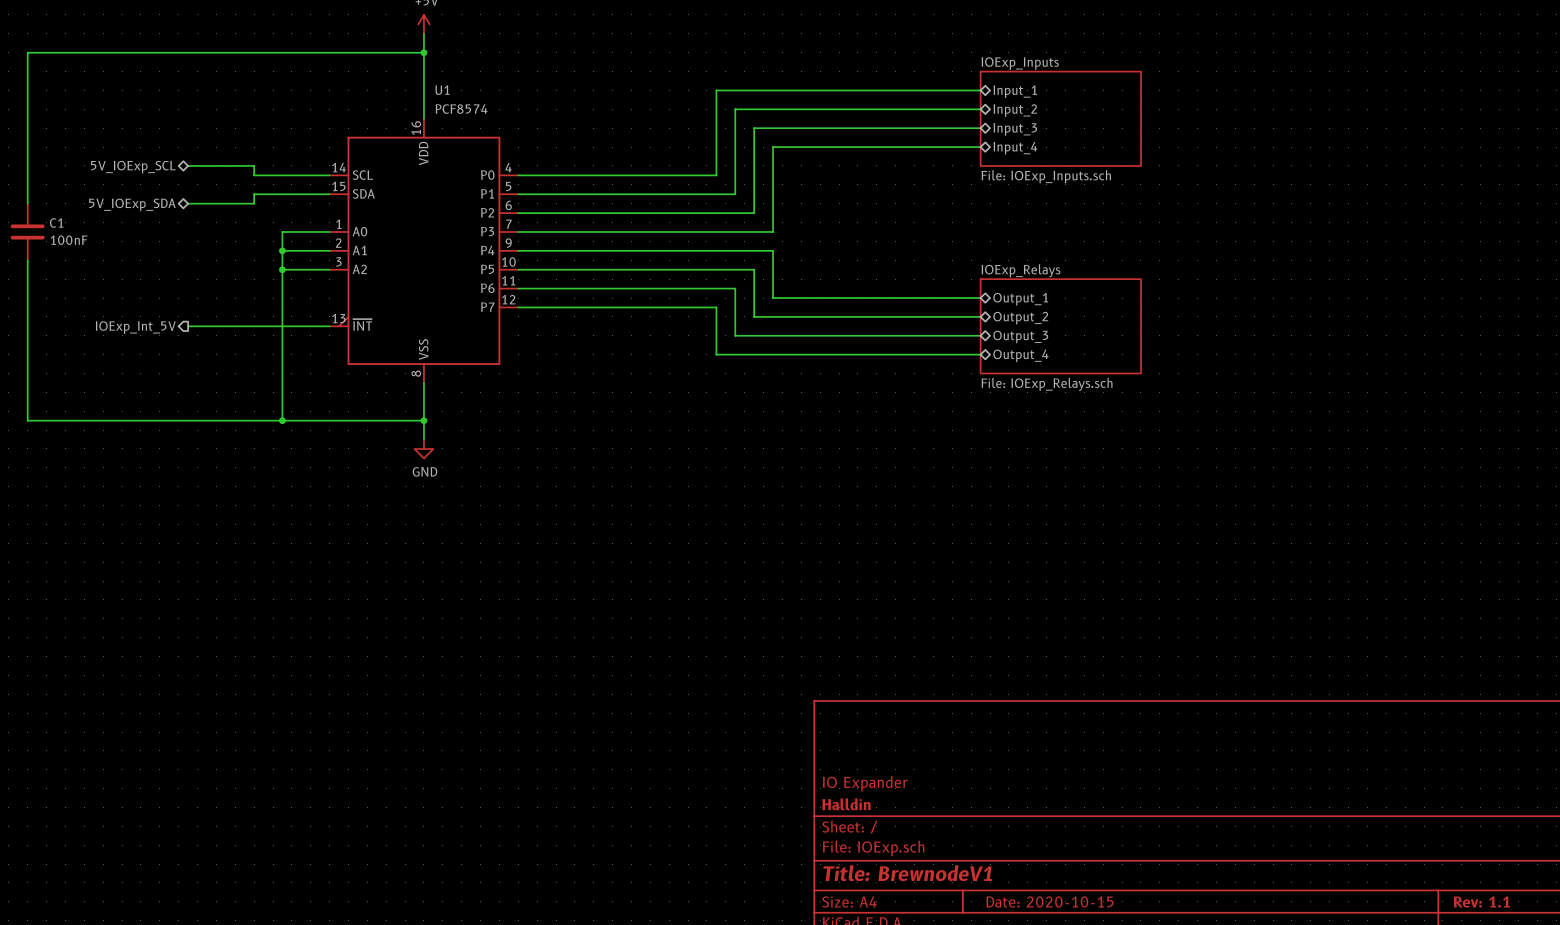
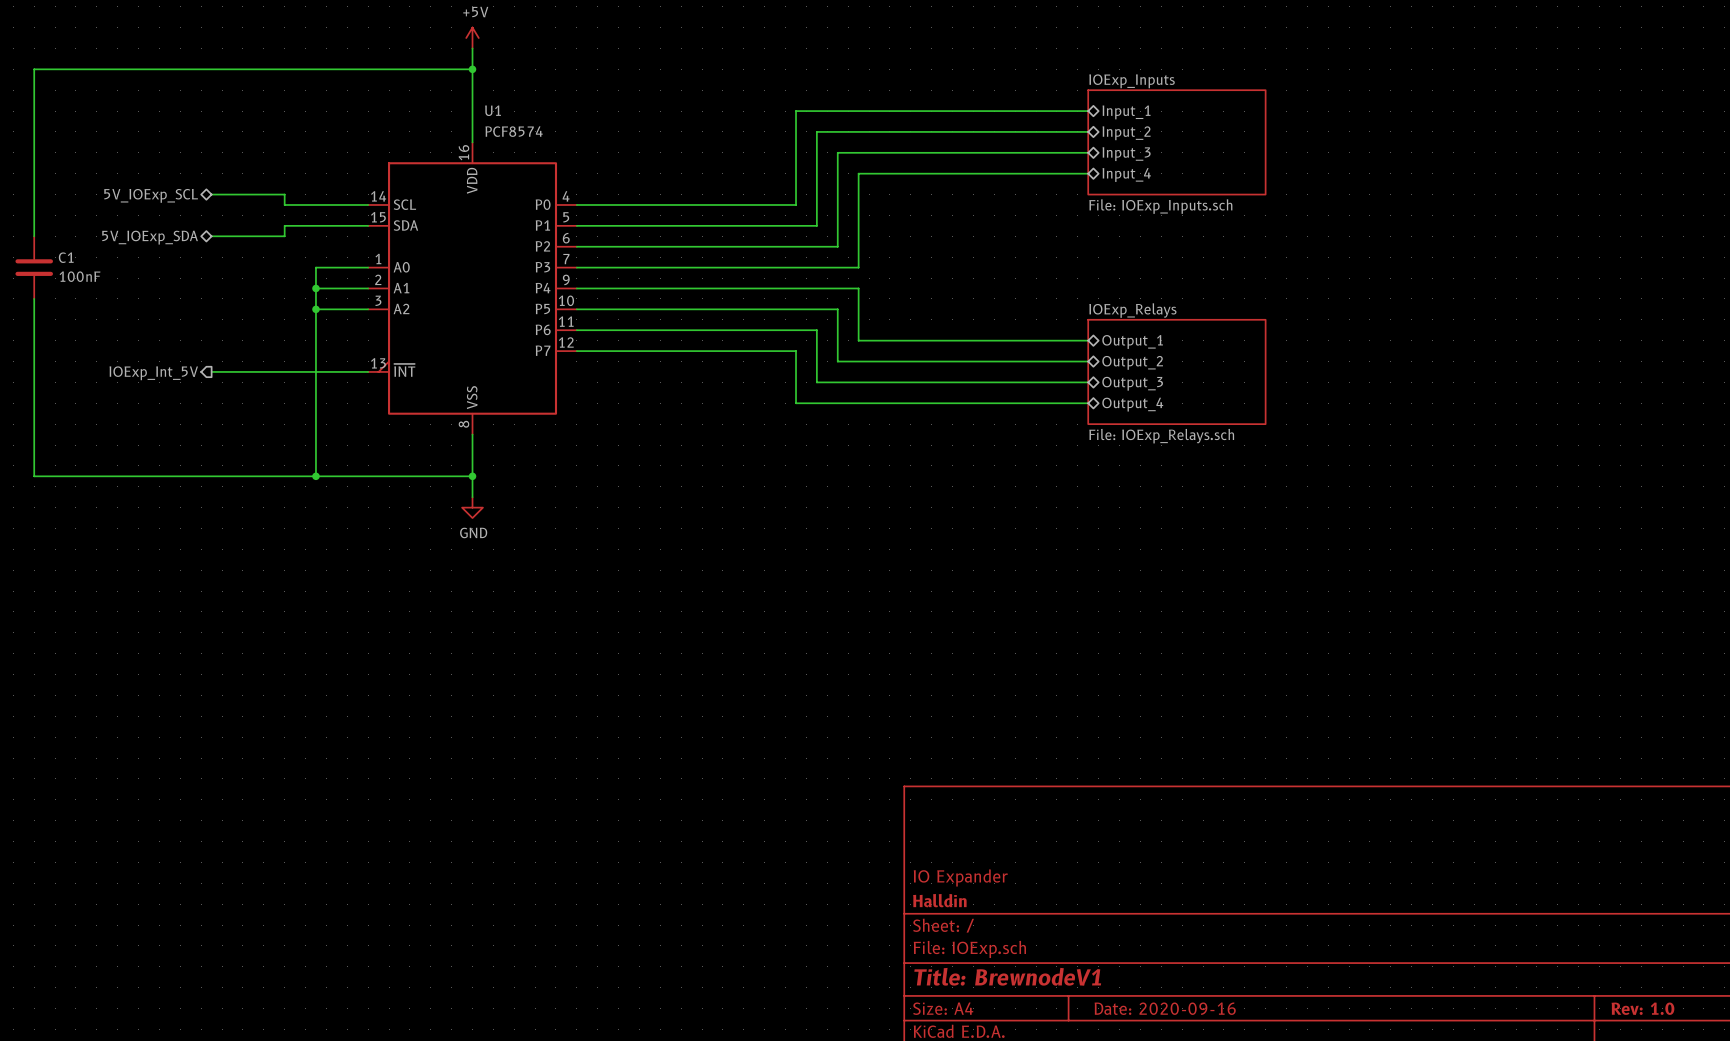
title block: Date: 2020-10-15 (1049, 901) -> Date: 2020-09-16 (1165, 1008)
title block: Rev: 1.1 (1481, 902) -> Rev: 1.0 (1642, 1008)

